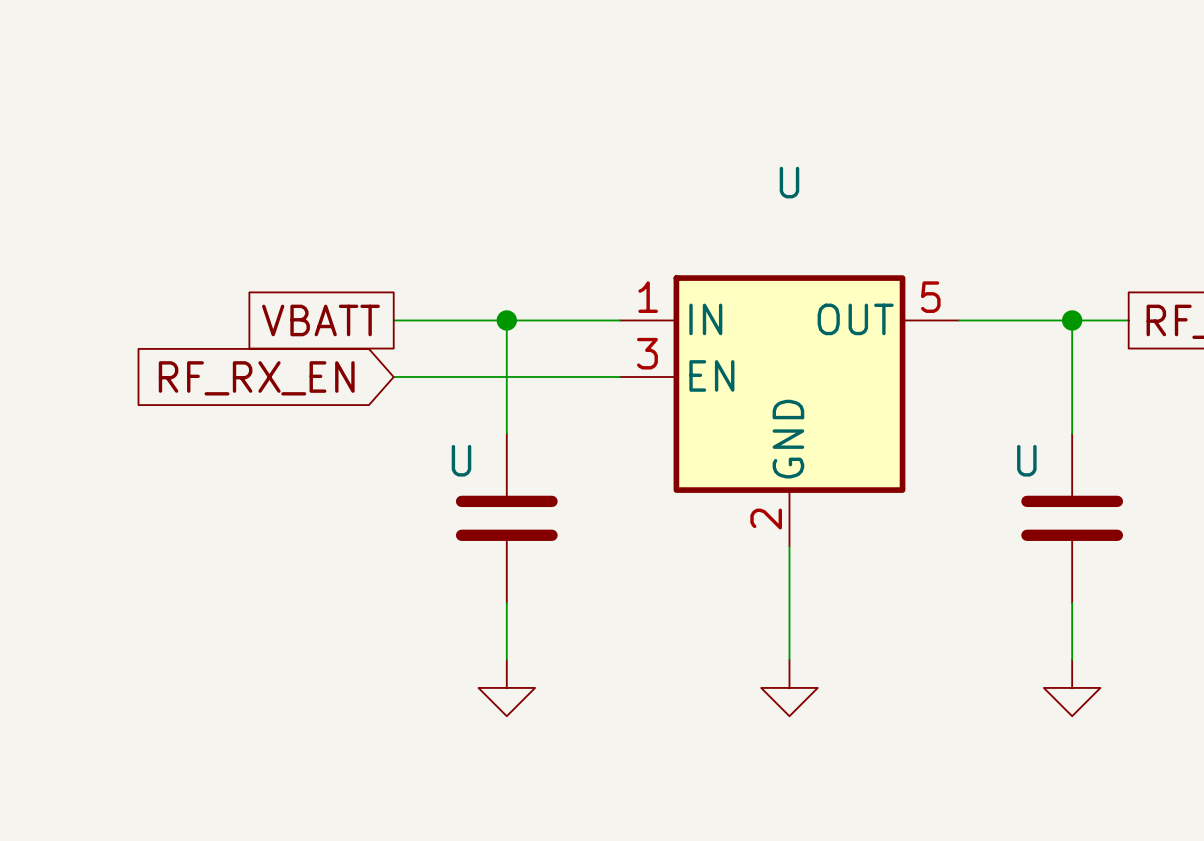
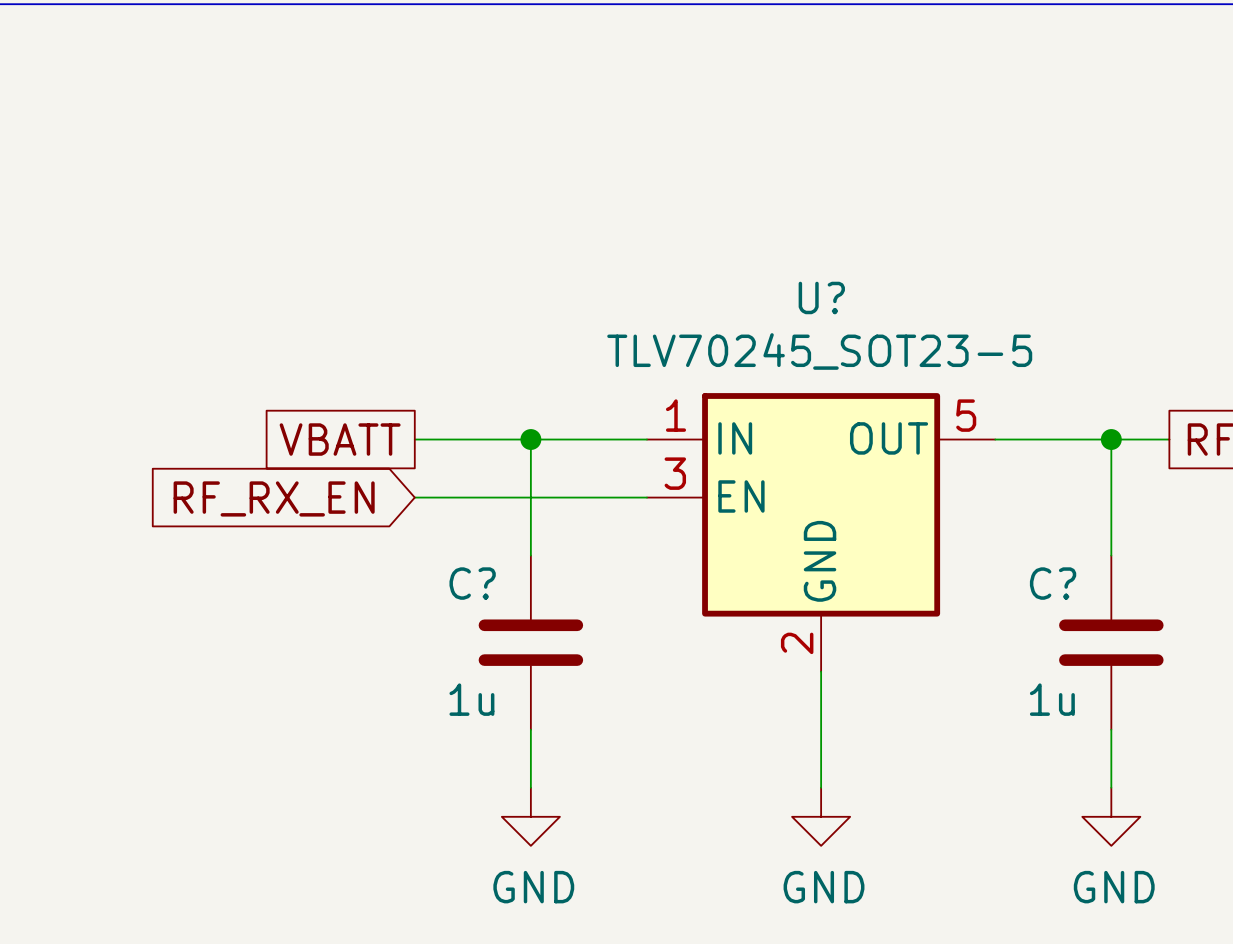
U name: U (789, 182) -> U? (821, 297)
U value: none -> TLV70245_SOT23-5 (819, 351)
U name: U (461, 460) -> C? (472, 583)
U name: U (1026, 460) -> C? (1053, 583)
U value: none -> 1u (471, 699)
U value: none -> 1u (1052, 699)
power symbol text: none -> GND (533, 887)
power symbol text: none -> GND (824, 887)
power symbol text: none -> GND (1114, 887)

